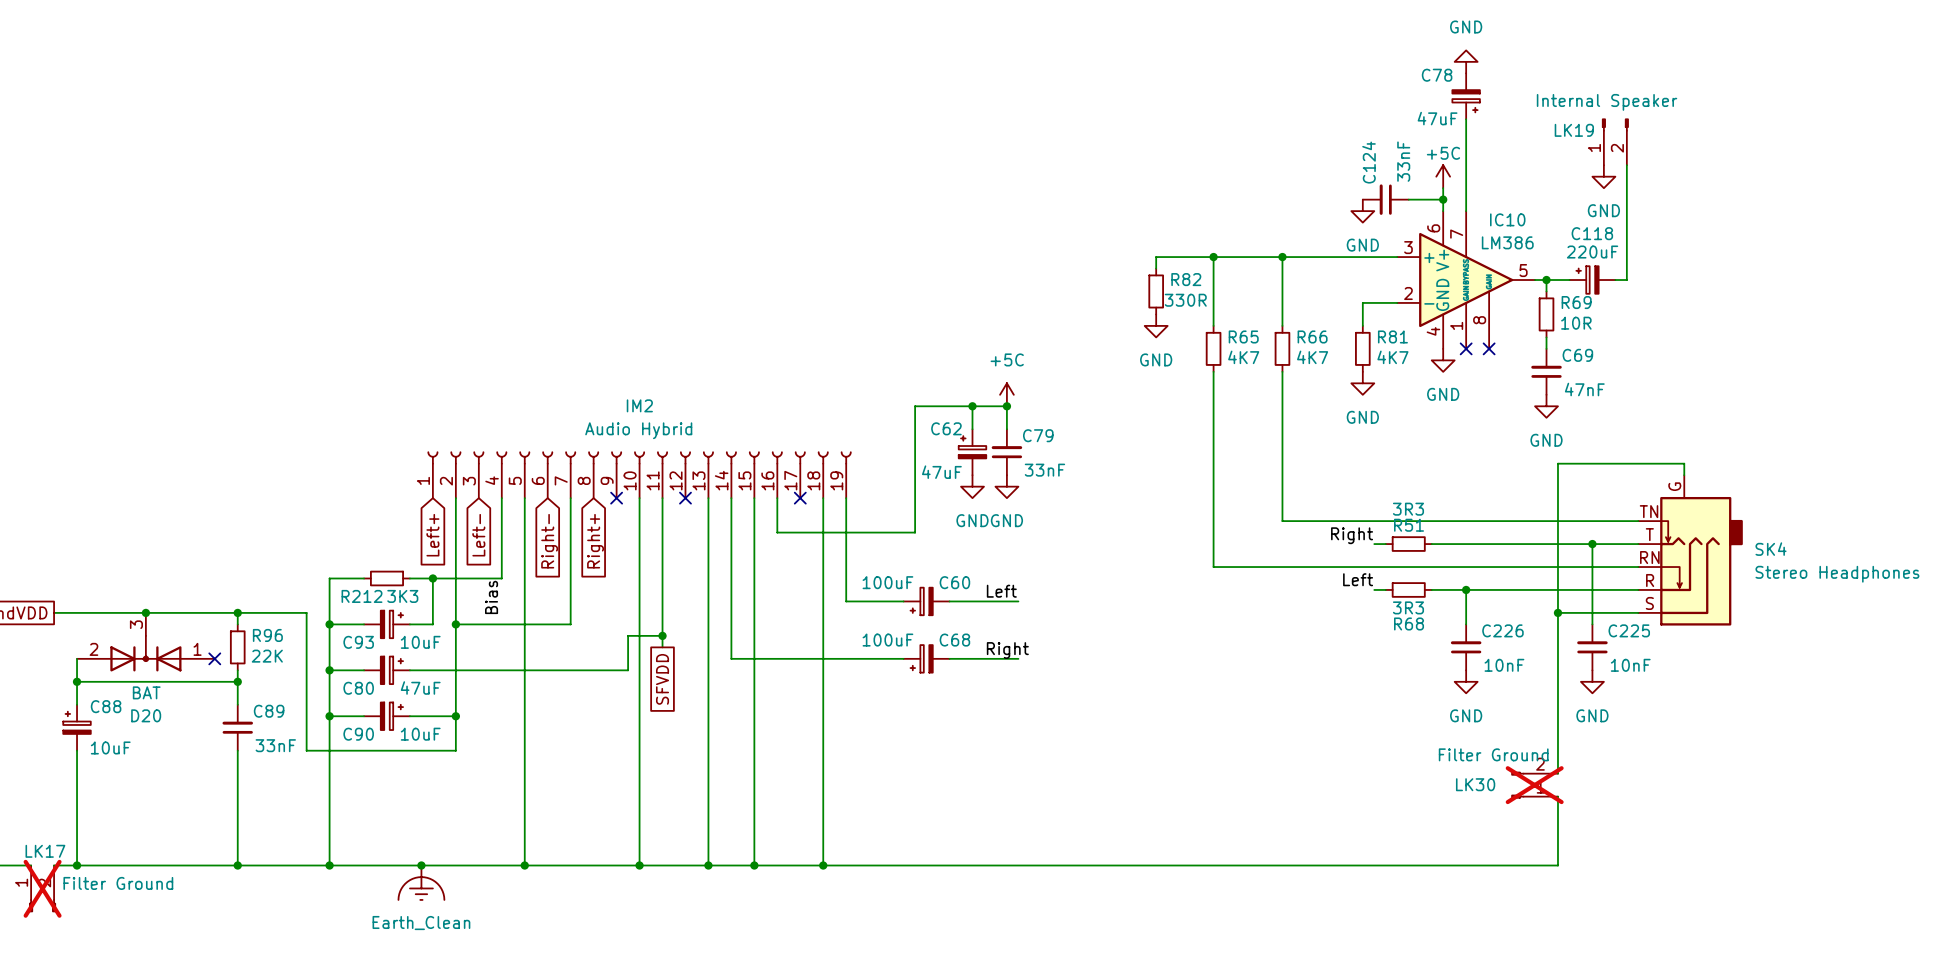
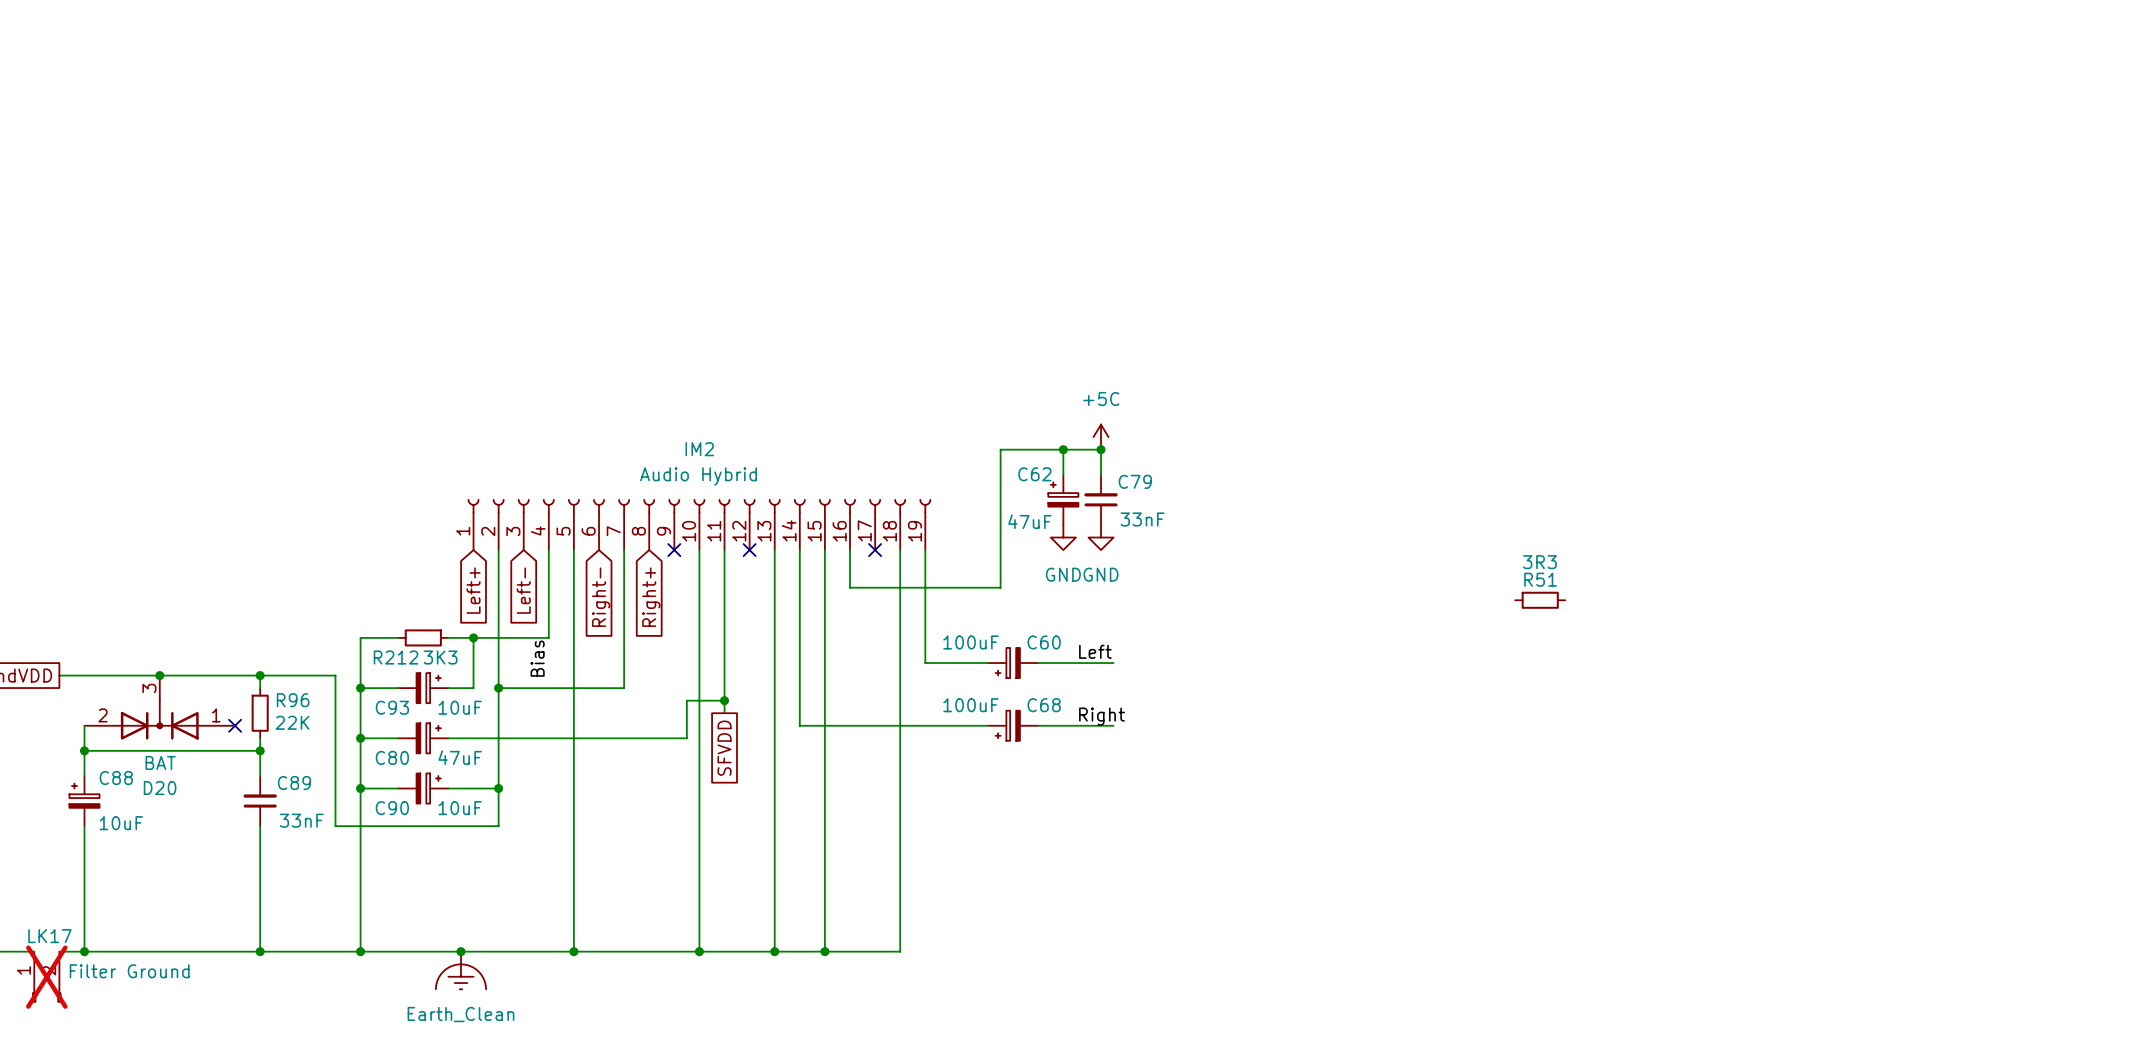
power symbol: GND (1466, 61) -> none
C78: 47uF (1466, 96) -> none
wire: (1466, 119) (1466, 211) -> none
LK19: Internal Speaker (1615, 141) -> none
wire: (1626, 165) (1626, 280) (1615, 280) -> none
power symbol: +5C (1443, 176) -> none
power symbol: GND (1603, 176) -> none
wire: (1443, 188) (1443, 211) -> none
C124: 33nF (1385, 199) -> none
wire: (1408, 199) (1443, 199) -> none
junction: (1443, 199) -> none
power symbol: GND (1362, 211) -> none
wire: (1213, 257) (1213, 325) -> none
junction: (1213, 257) -> none
wire: (1282, 257) (1282, 325) -> none
junction: (1282, 257) -> none
wire: (1397, 257) (1156, 257) (1156, 268) -> none
IC10: LM386 (1466, 280) -> none
wire: (1535, 280) (1569, 280) -> none
wire: (1546, 280) (1546, 291) -> none
junction: (1546, 280) -> none
C118: 220uF (1592, 280) -> none
R82: 330R (1156, 291) -> none
wire: (1397, 302) (1362, 302) (1362, 325) -> none
R69: 10R (1546, 314) -> none
power symbol: GND (1156, 325) -> none
wire: (1546, 337) (1546, 348) -> none
R65: 4K7 (1213, 348) -> none
R66: 4K7 (1282, 348) -> none
R81: 4K7 (1362, 348) -> none
no-connect mark: (1466, 348) -> none
no-connect mark: (1489, 348) -> none
power symbol: GND (1443, 360) -> none
wire: (1213, 371) (1213, 567) (1638, 567) -> none
wire: (1282, 371) (1282, 521) (1638, 521) -> none
C69: 47nF (1546, 371) -> none
power symbol: GND (1362, 383) -> none
power symbol: GND (1546, 406) -> none
wire: (1684, 475) (1684, 463) (1557, 463) (1557, 773) -> none
label: Right (1352, 535) -> none
wire: (1374, 544) (1385, 544) -> none
wire: (1431, 544) (1638, 544) -> none
wire: (1592, 544) (1592, 624) -> none
junction: (1592, 544) -> none
SK4: Stereo Headphones (1690, 550) -> none
label: Left (1358, 579) -> none
wire: (1374, 589) (1385, 589) -> none
R68: 3R3 (1408, 589) -> none
wire: (1431, 589) (1638, 589) -> none
wire: (1466, 589) (1466, 624) -> none
junction: (1466, 589) -> none
wire: (1557, 612) (1638, 612) -> none
junction: (1557, 612) -> none
C226: 10nF (1466, 647) -> none
C225: 10nF (1592, 647) -> none
power symbol: GND (1466, 681) -> none
power symbol: GND (1592, 681) -> none
LK30: Filter Ground (1534, 785) -> none
wire: (1557, 796) (1557, 865) (823, 865) -> none
junction: (823, 865) -> none

